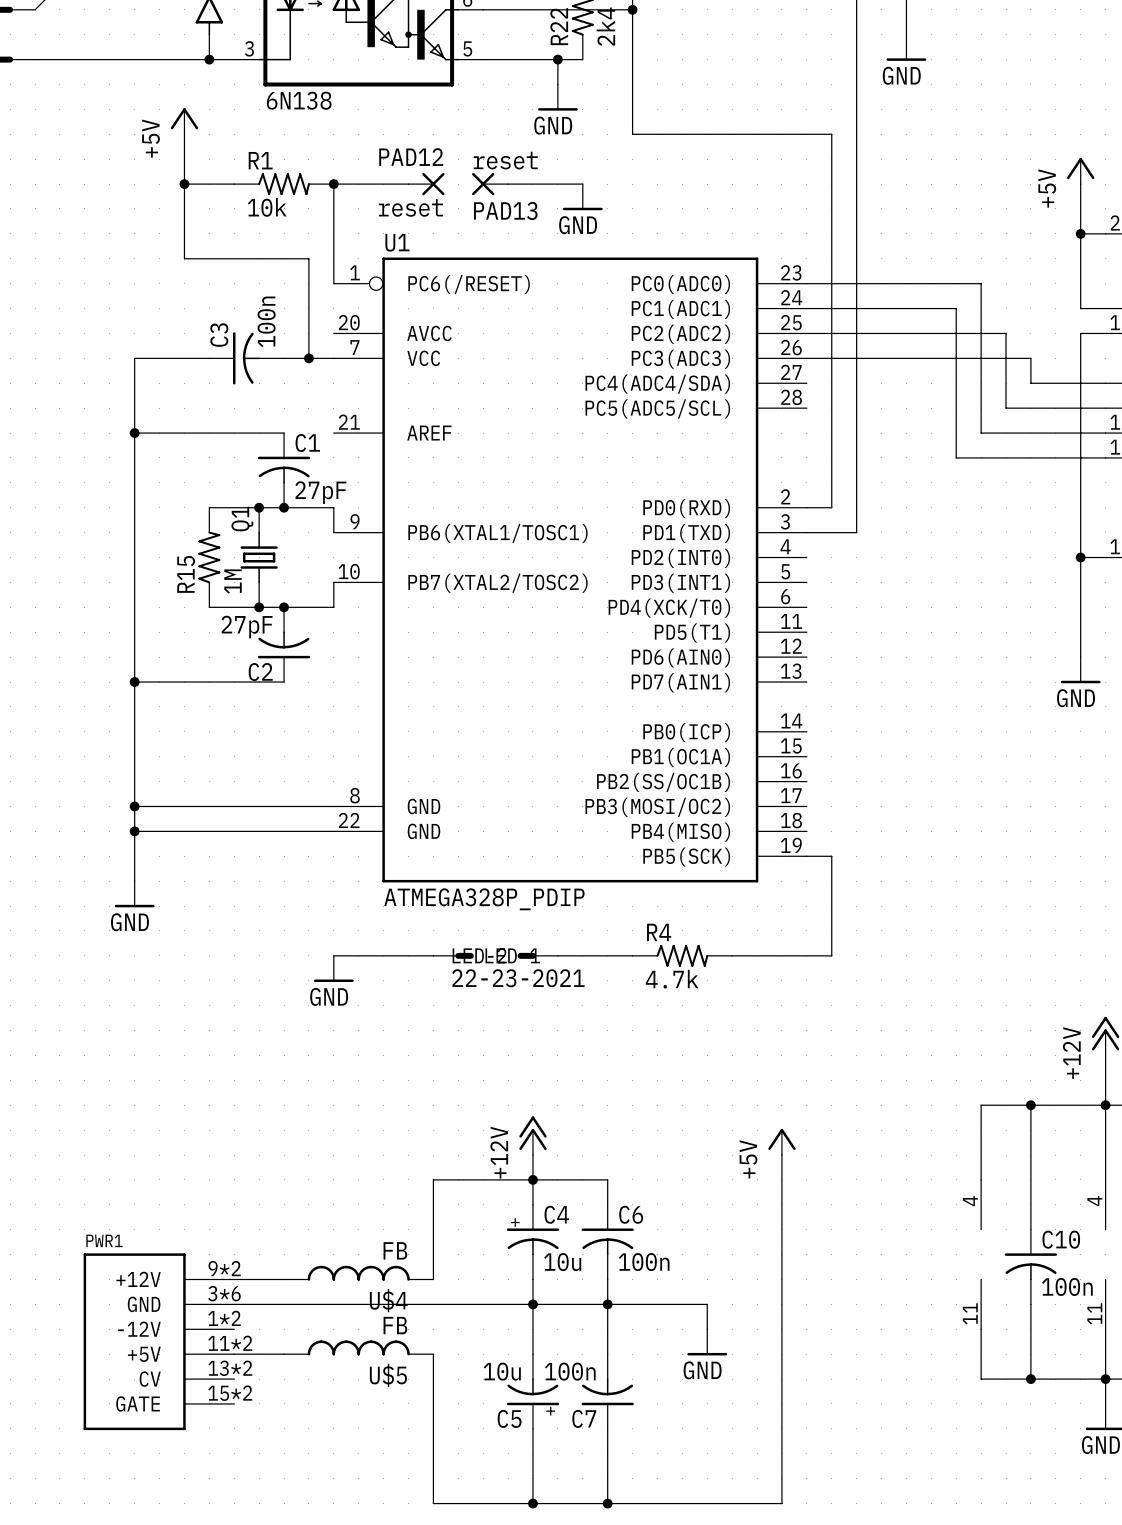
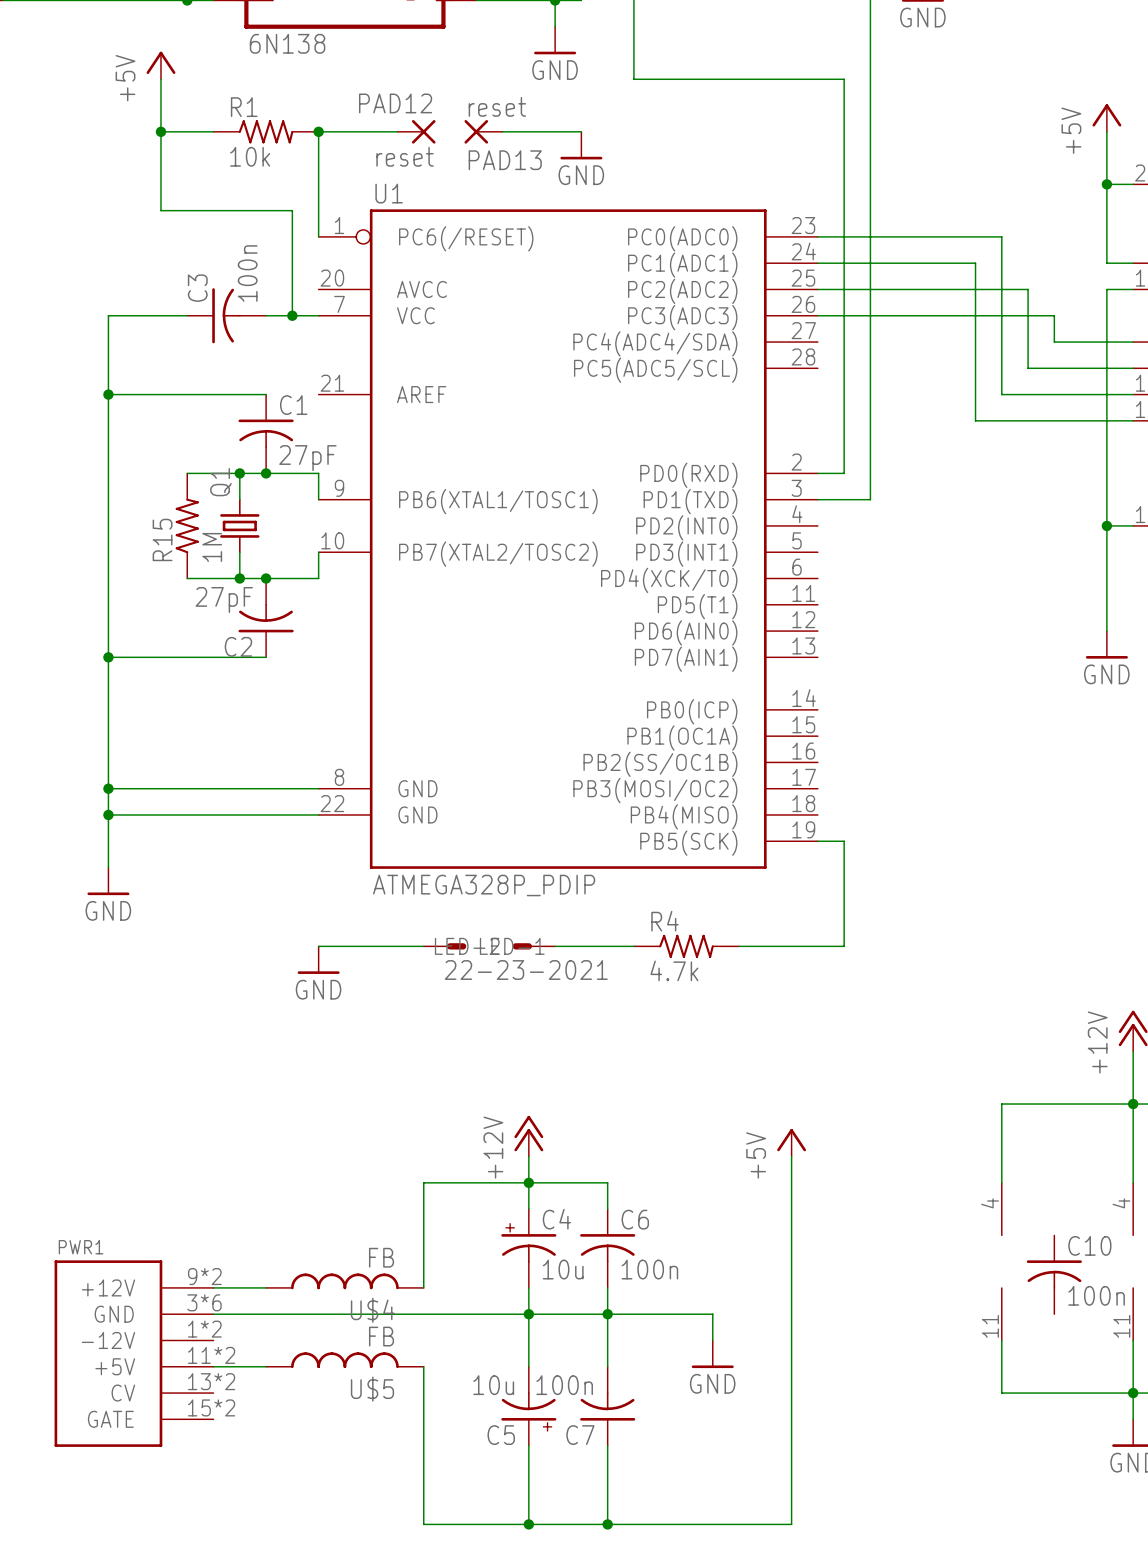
wire: (1030, 1105) (1030, 1229) -> none
junction: (1030, 1105) -> none
wire: (1030, 1304) (1030, 1379) -> none
junction: (1030, 1379) -> none

